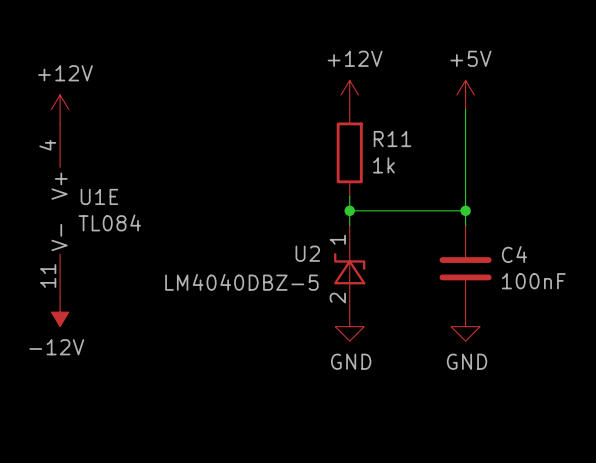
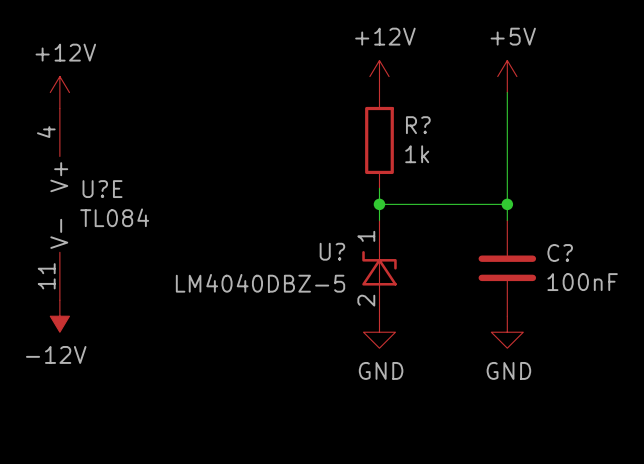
R11 name: R11 (392, 139) -> R? (418, 125)
U1E name: U1E (99, 196) -> U?E (102, 189)
U2 name: U2 (307, 253) -> U? (332, 251)
C4 name: C4 (514, 254) -> C? (560, 253)

